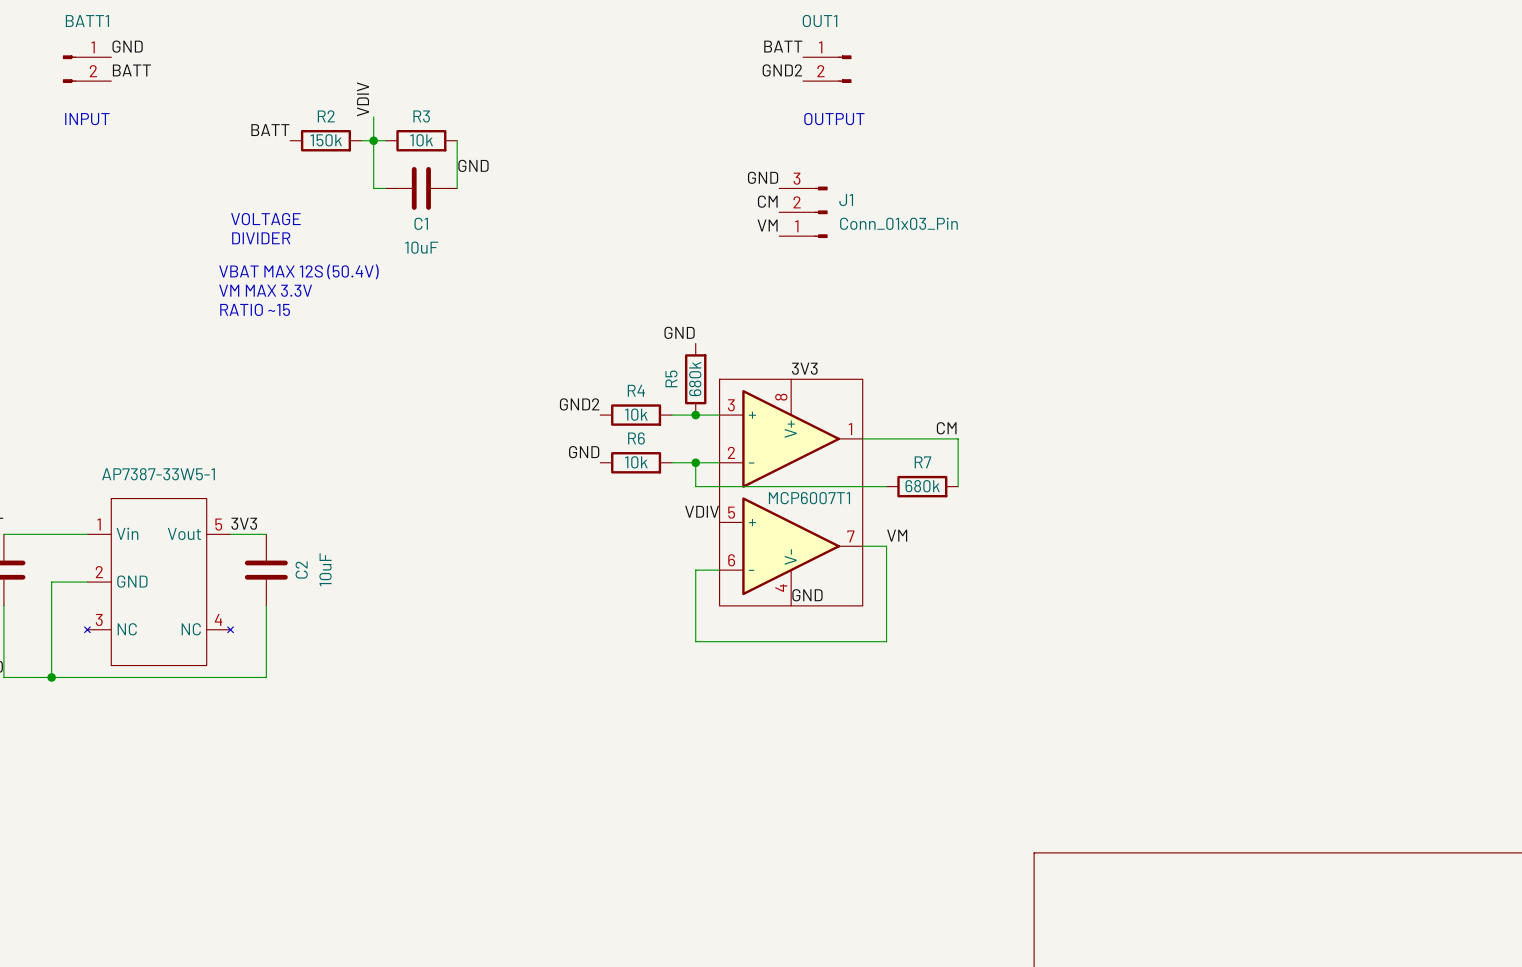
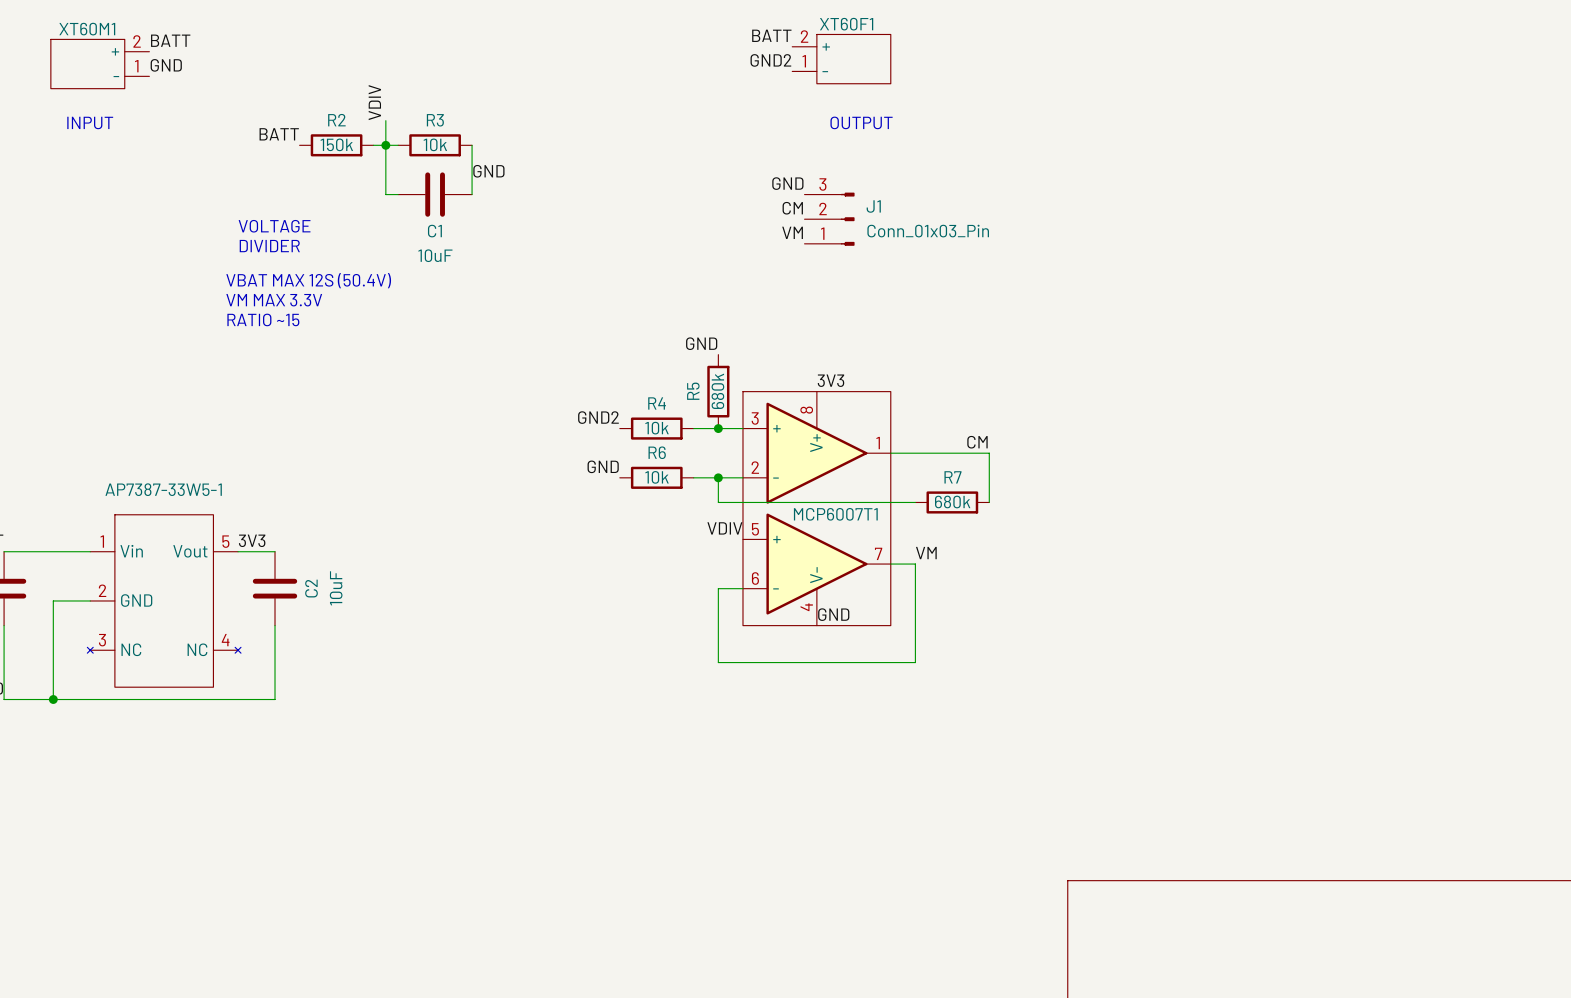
label position: GND (127, 46) -> GND (166, 65)
label position: BATT (783, 46) -> BATT (771, 35)
XT60F1: none -> (841, 59)
XT60M1: none -> (100, 64)
BATT1: (87, 69) -> none
OUT1: (827, 69) -> none
label position: BATT (131, 70) -> BATT (170, 40)
label position: GND2 (782, 70) -> GND2 (770, 60)

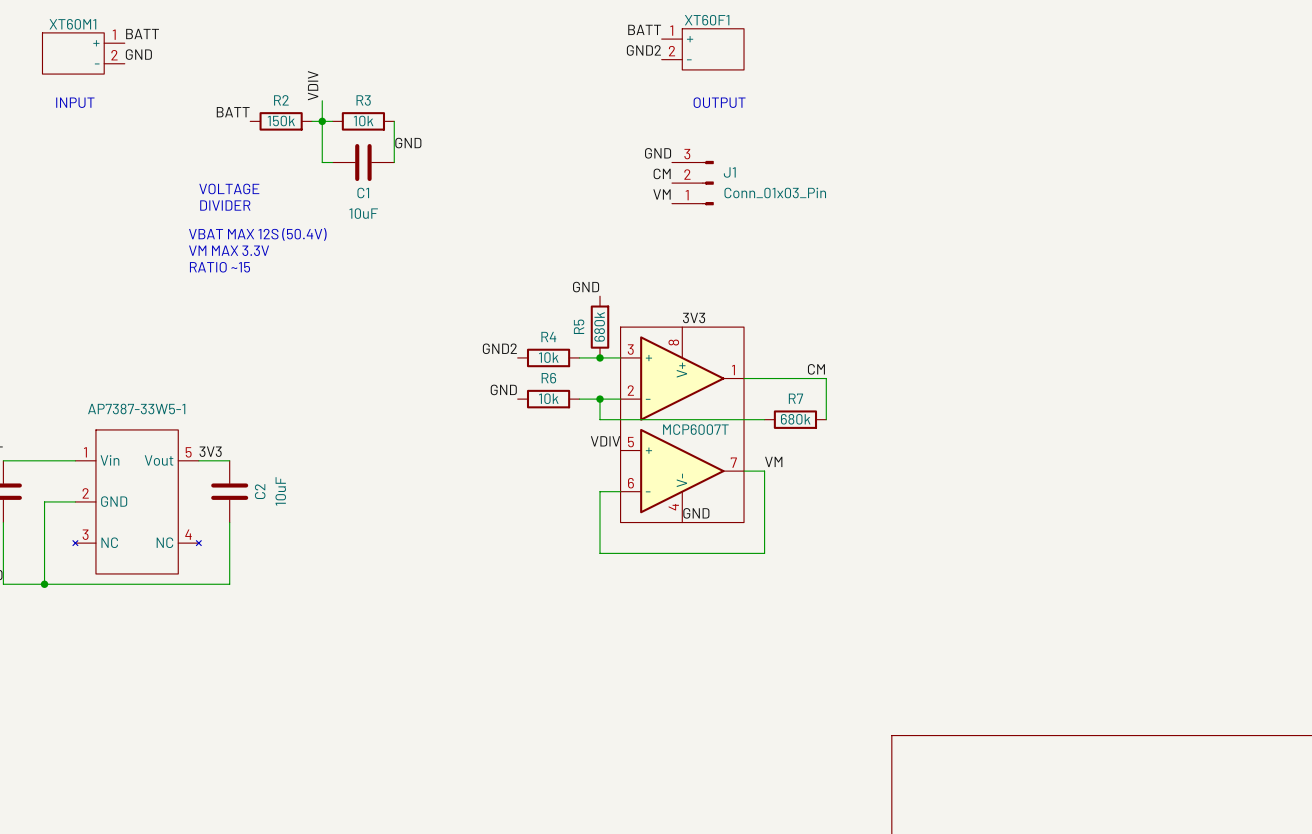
XT60F1 pin number: 2 (804, 36) -> 1 (671, 30)
XT60M1 pin number: 2 (137, 41) -> 1 (114, 34)
XT60F1 pin number: 1 (804, 61) -> 2 (671, 51)
XT60M1 pin number: 1 (136, 66) -> 2 (114, 55)
MCP6007T1 name: MCP6007T1 (835, 514) -> MCP6007T (695, 429)

